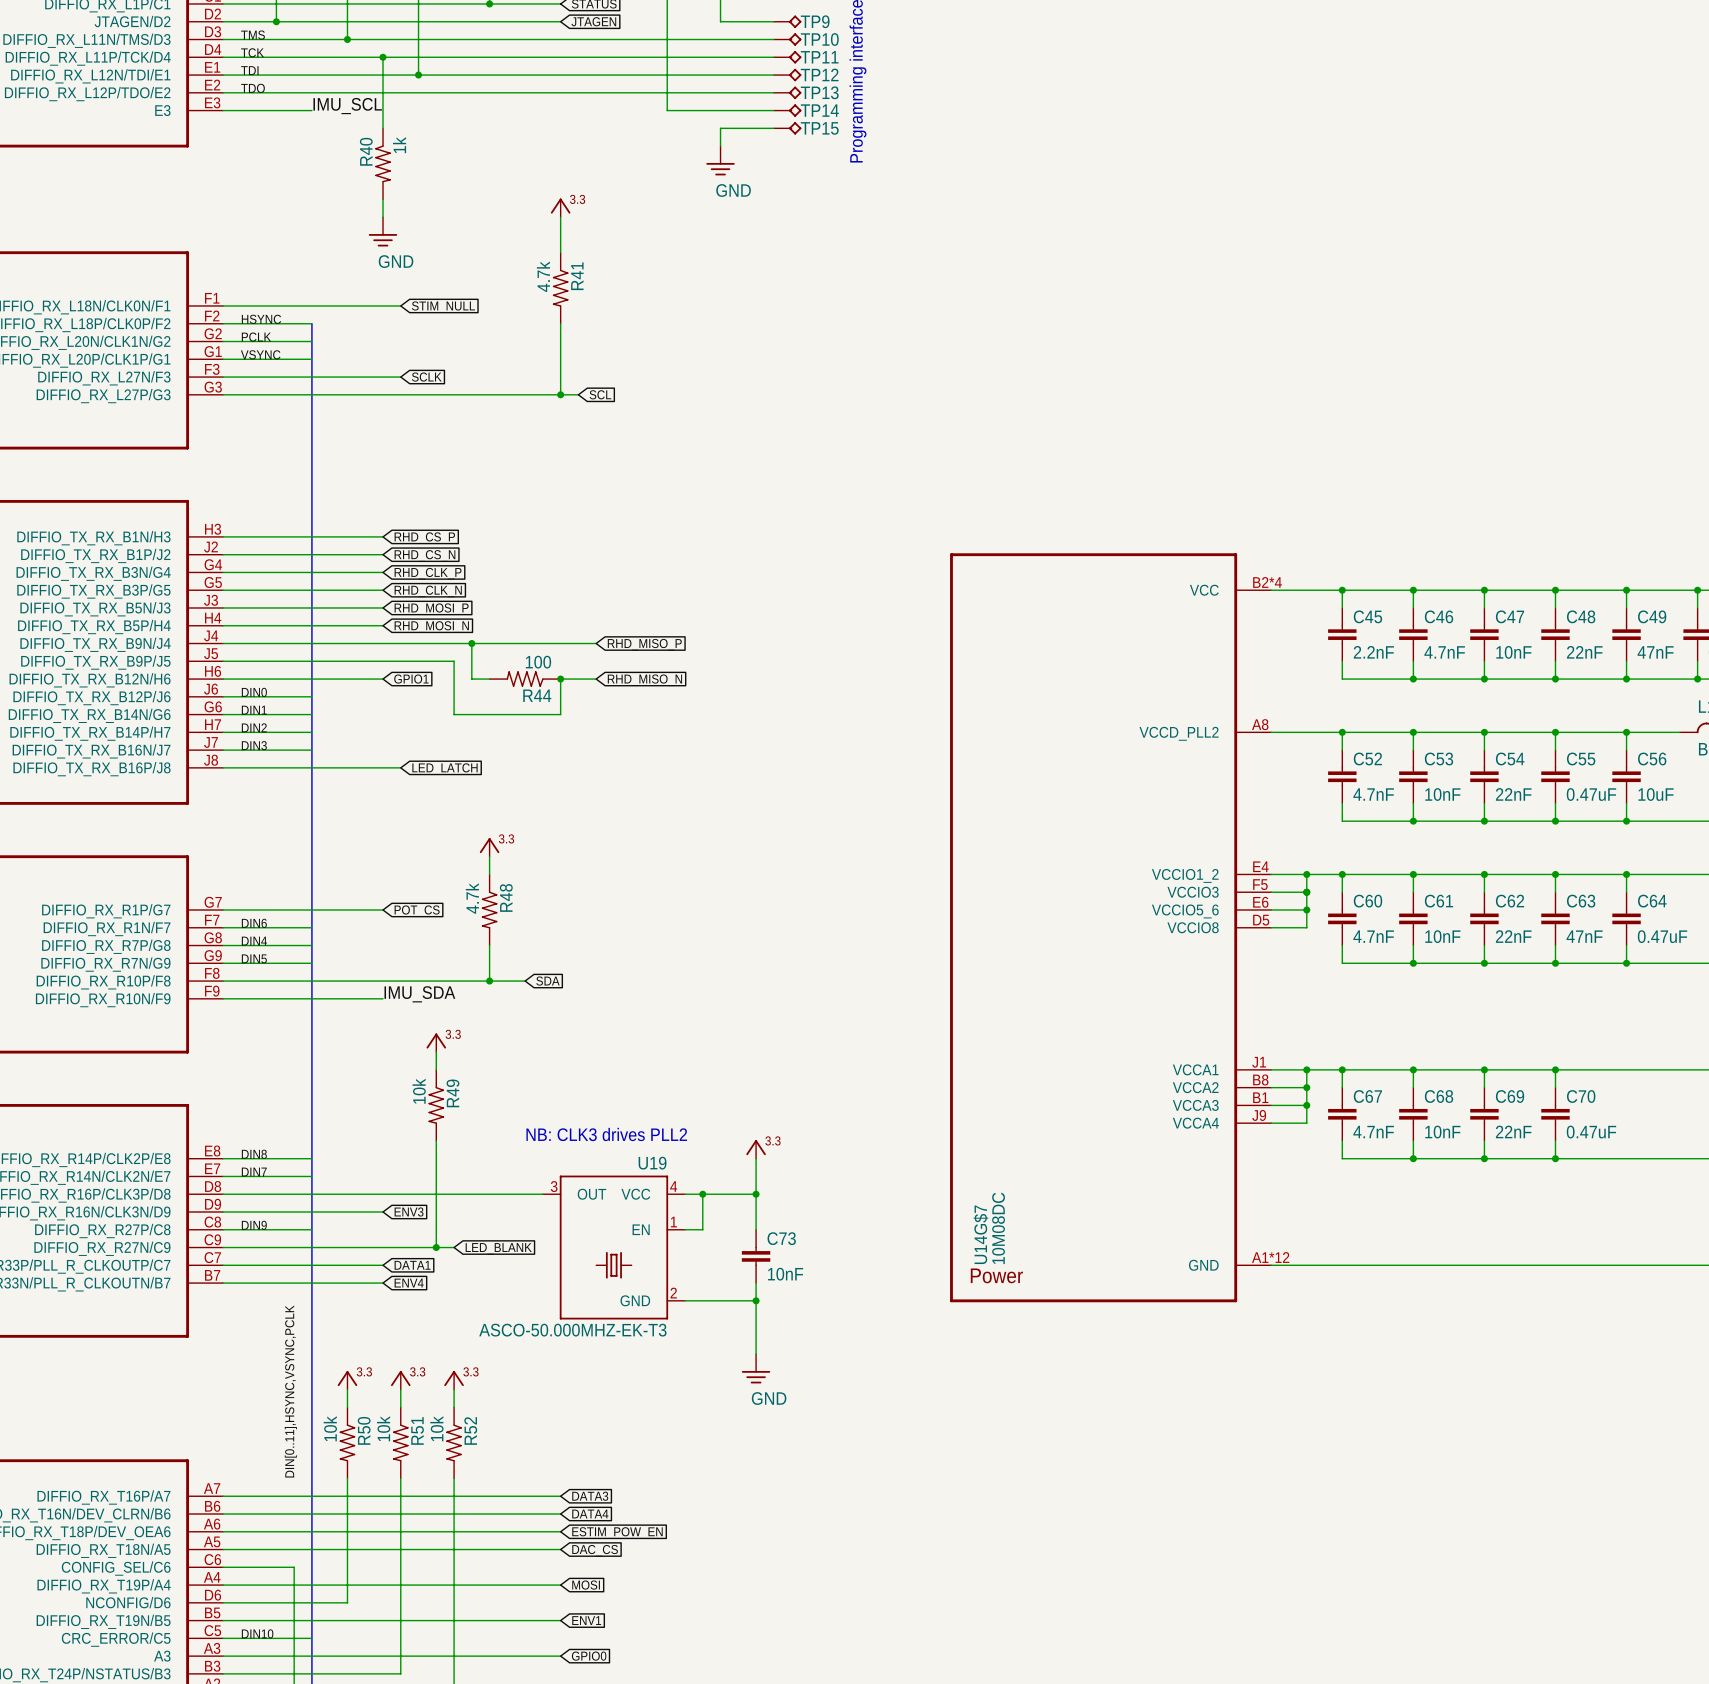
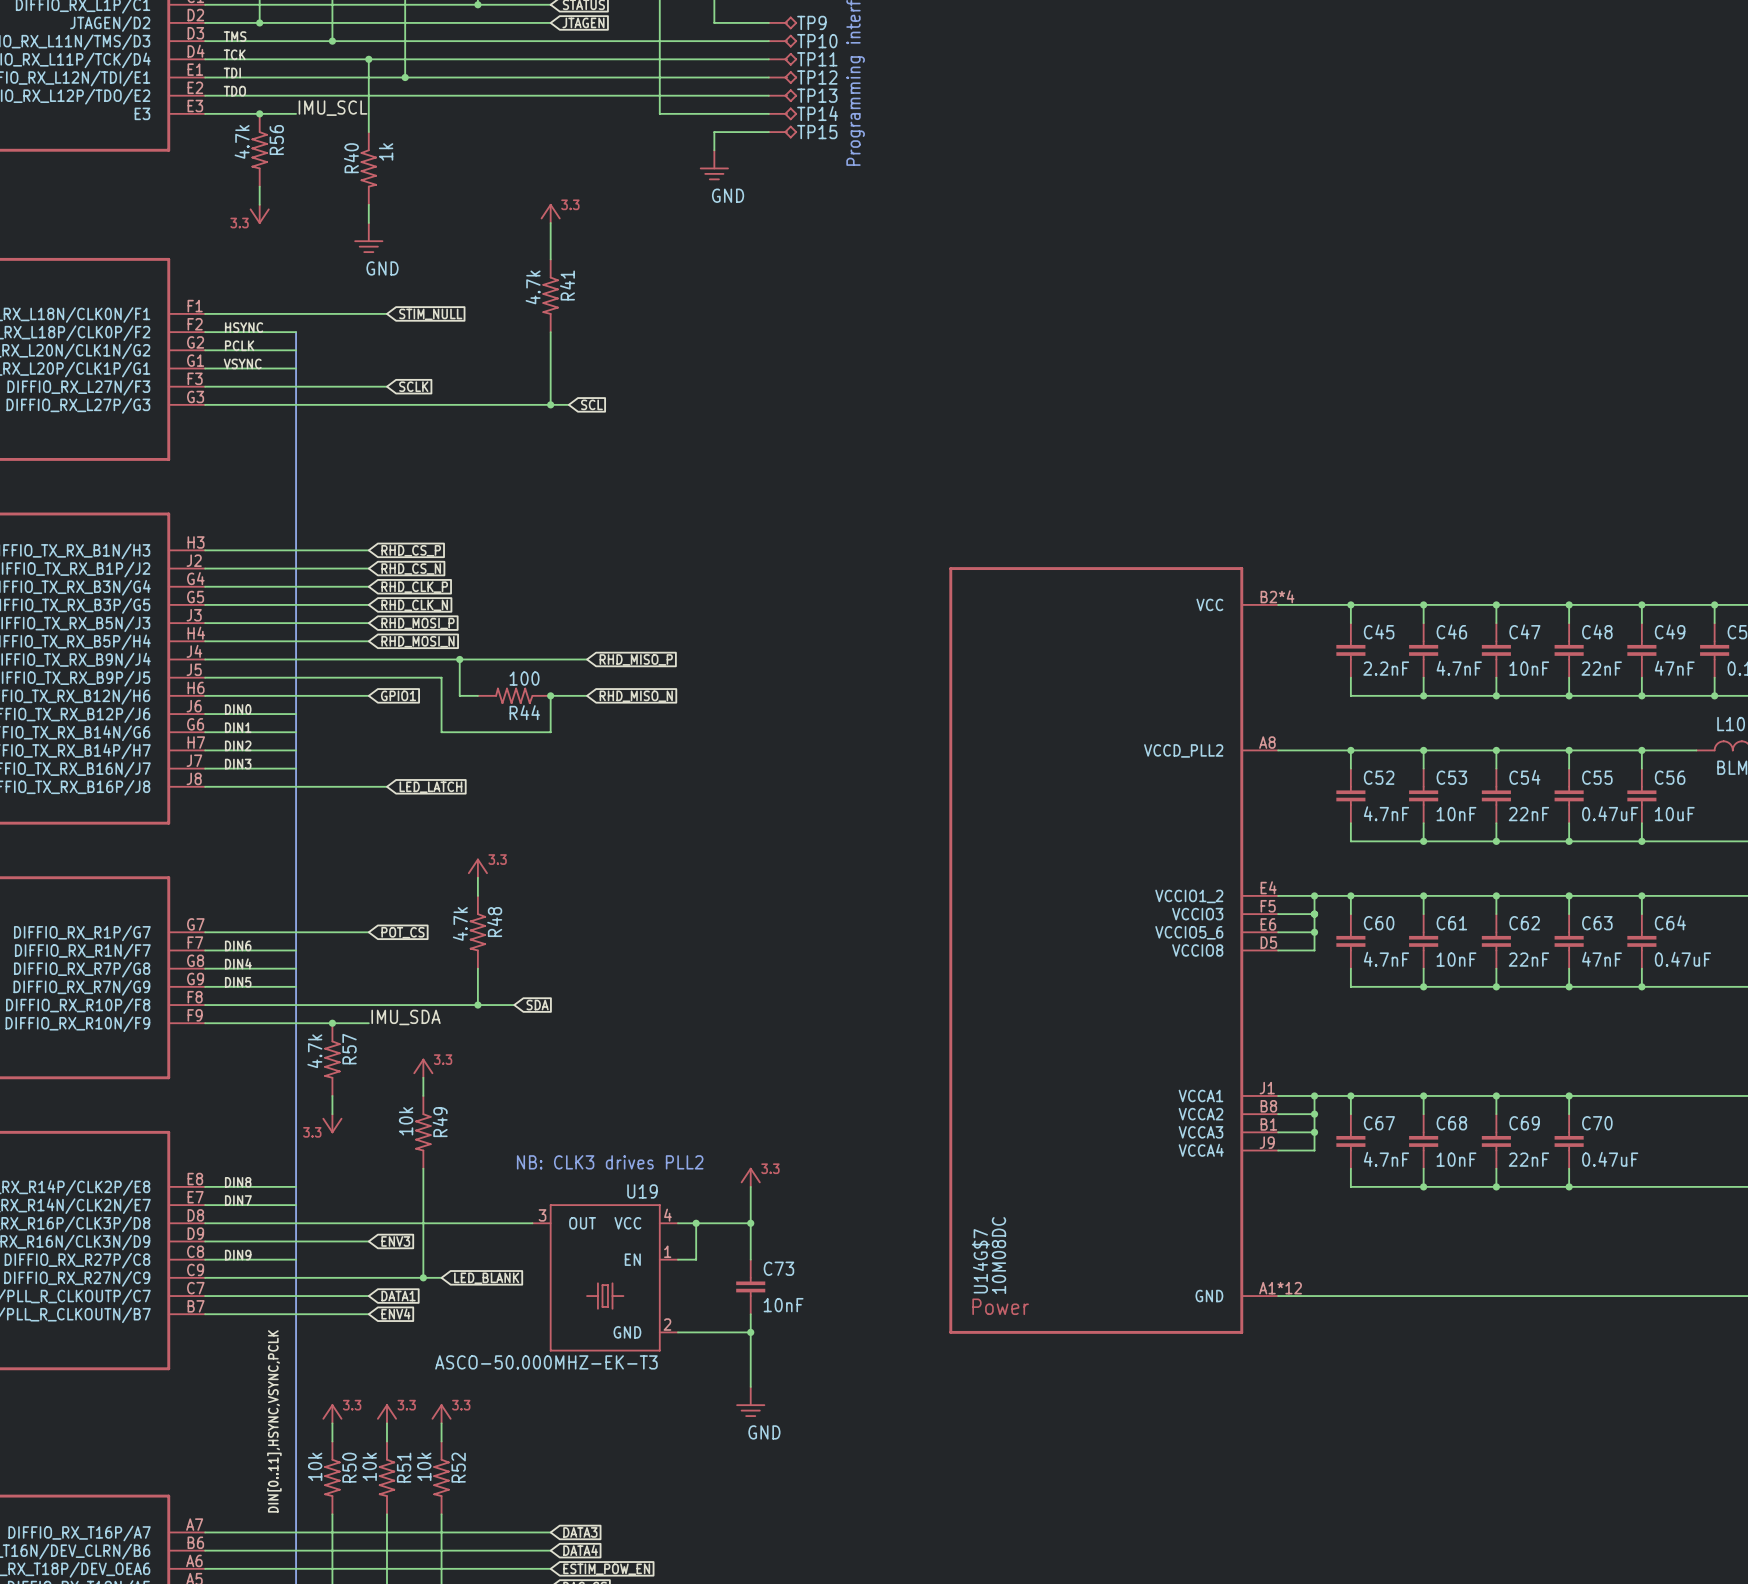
junction: none -> (259, 113)
R56: none -> 4.7k (259, 150)
wire: none -> (259, 186) (259, 204)
power symbol: none -> (259, 214)
junction: none -> (332, 1023)
R57: none -> 4.7k (332, 1059)
wire: none -> (332, 1095) (332, 1114)
power symbol: none -> (332, 1123)

